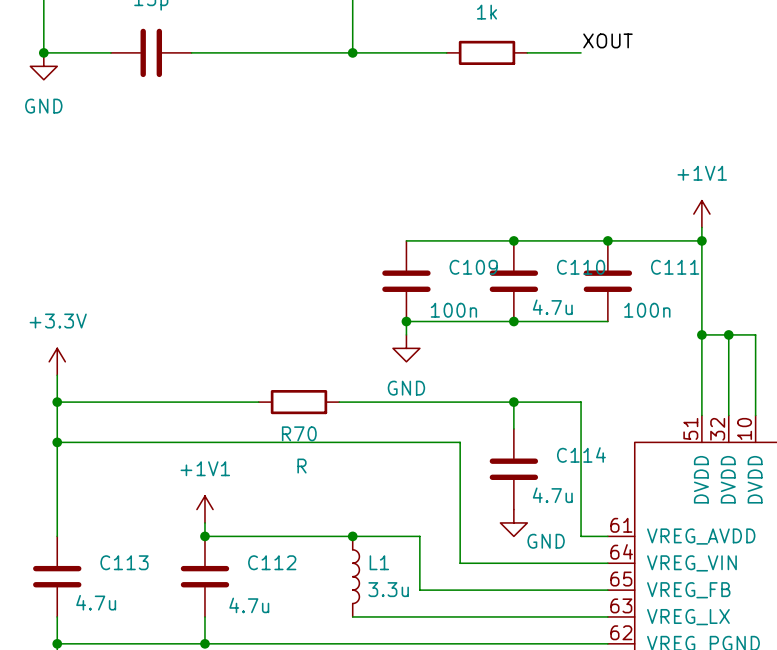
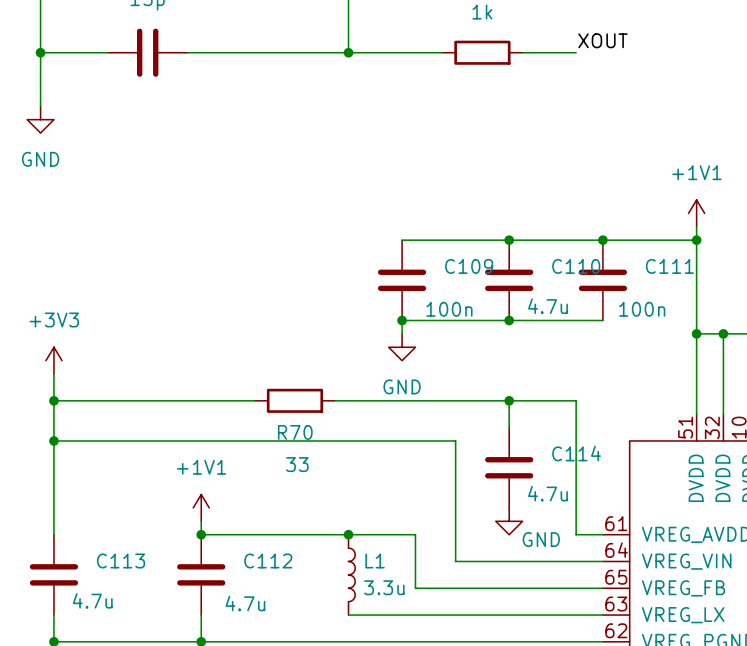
wire: none -> (40, 52) (40, 106)
power symbol position: GND (43, 66) -> GND (40, 119)
power symbol: +3.3V (57, 361) -> +3V3 (53, 360)
R70 value: R (302, 466) -> 33 (297, 464)

